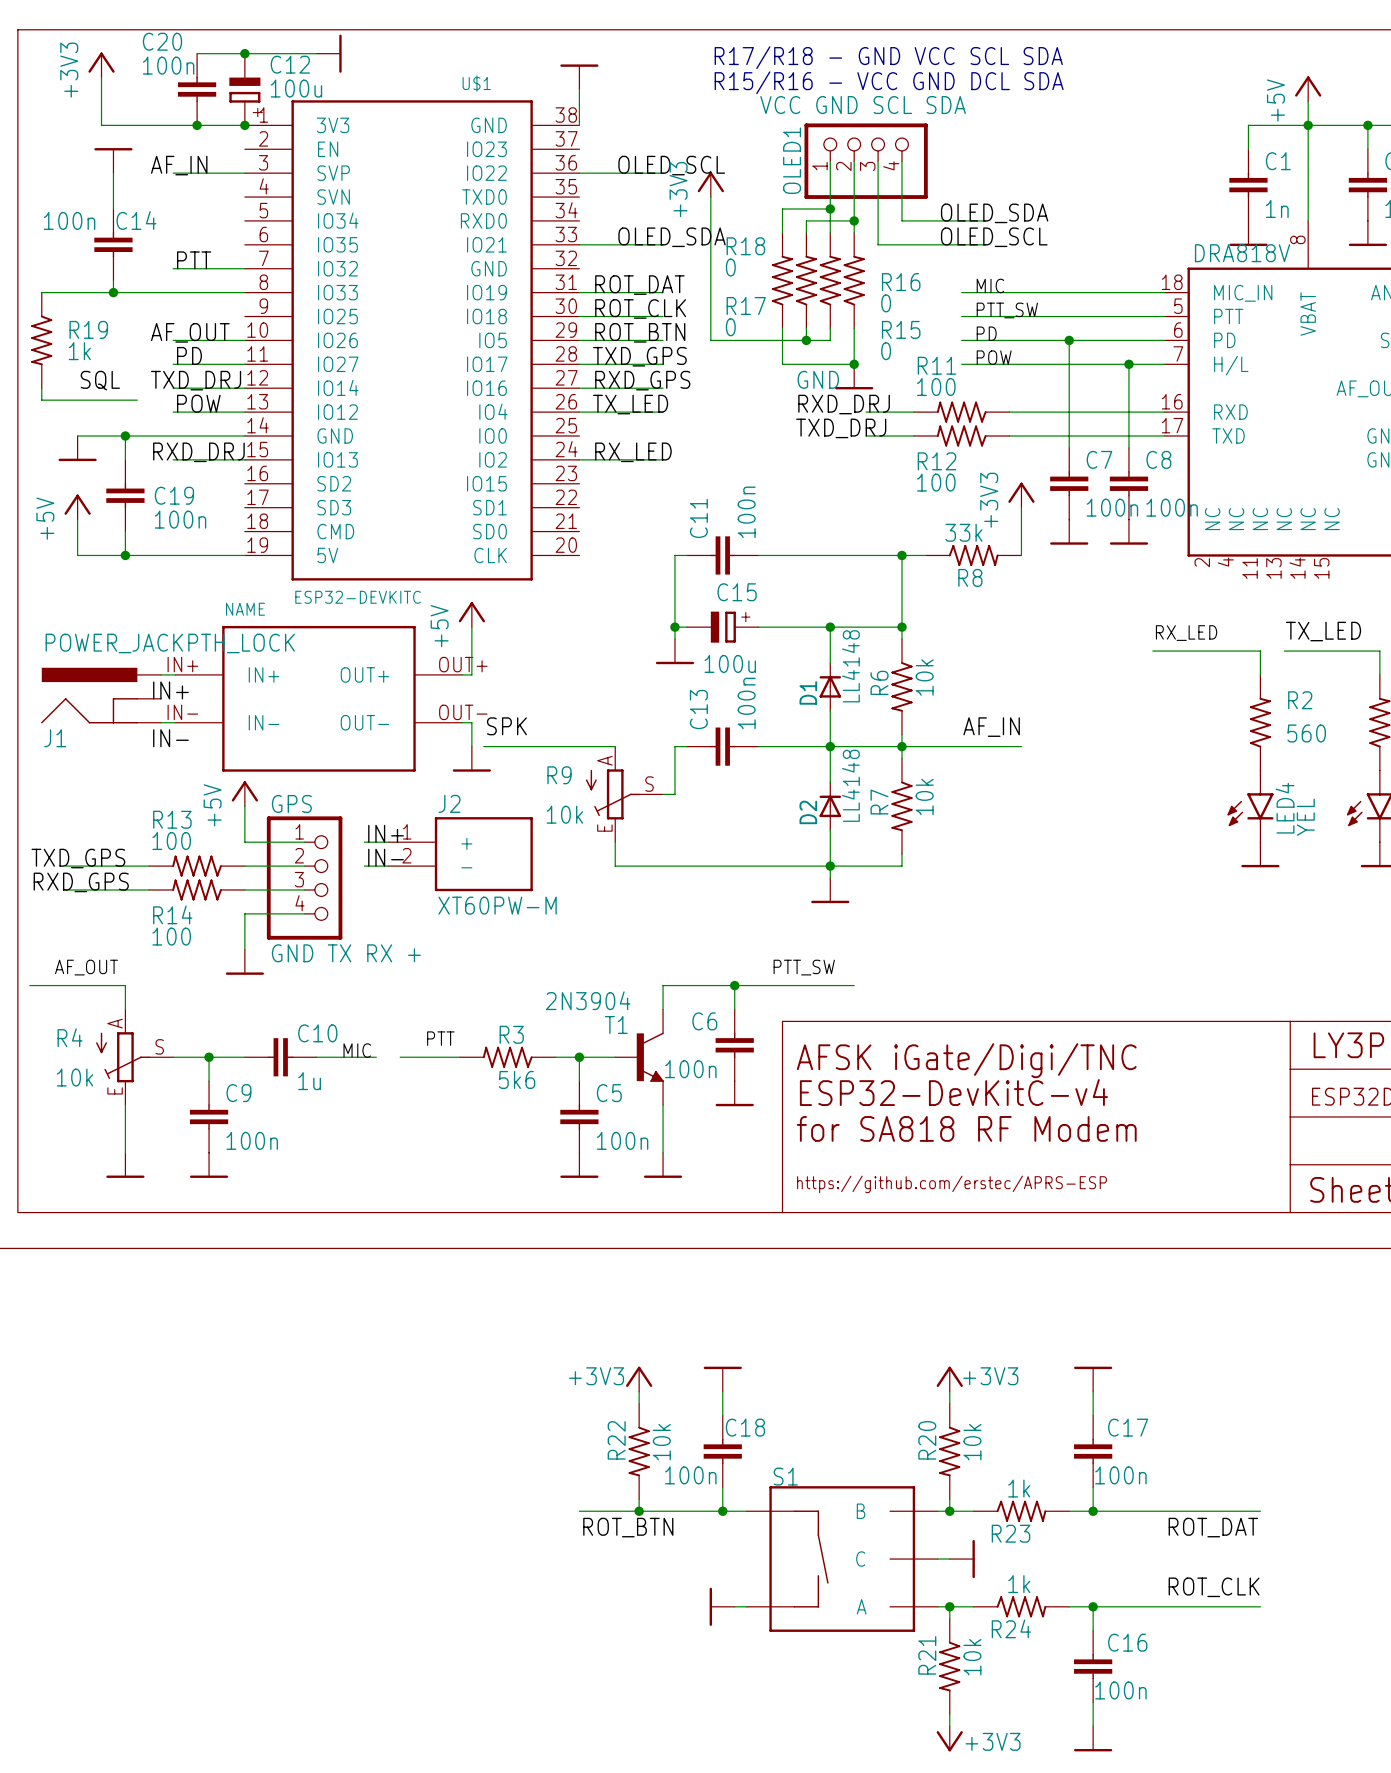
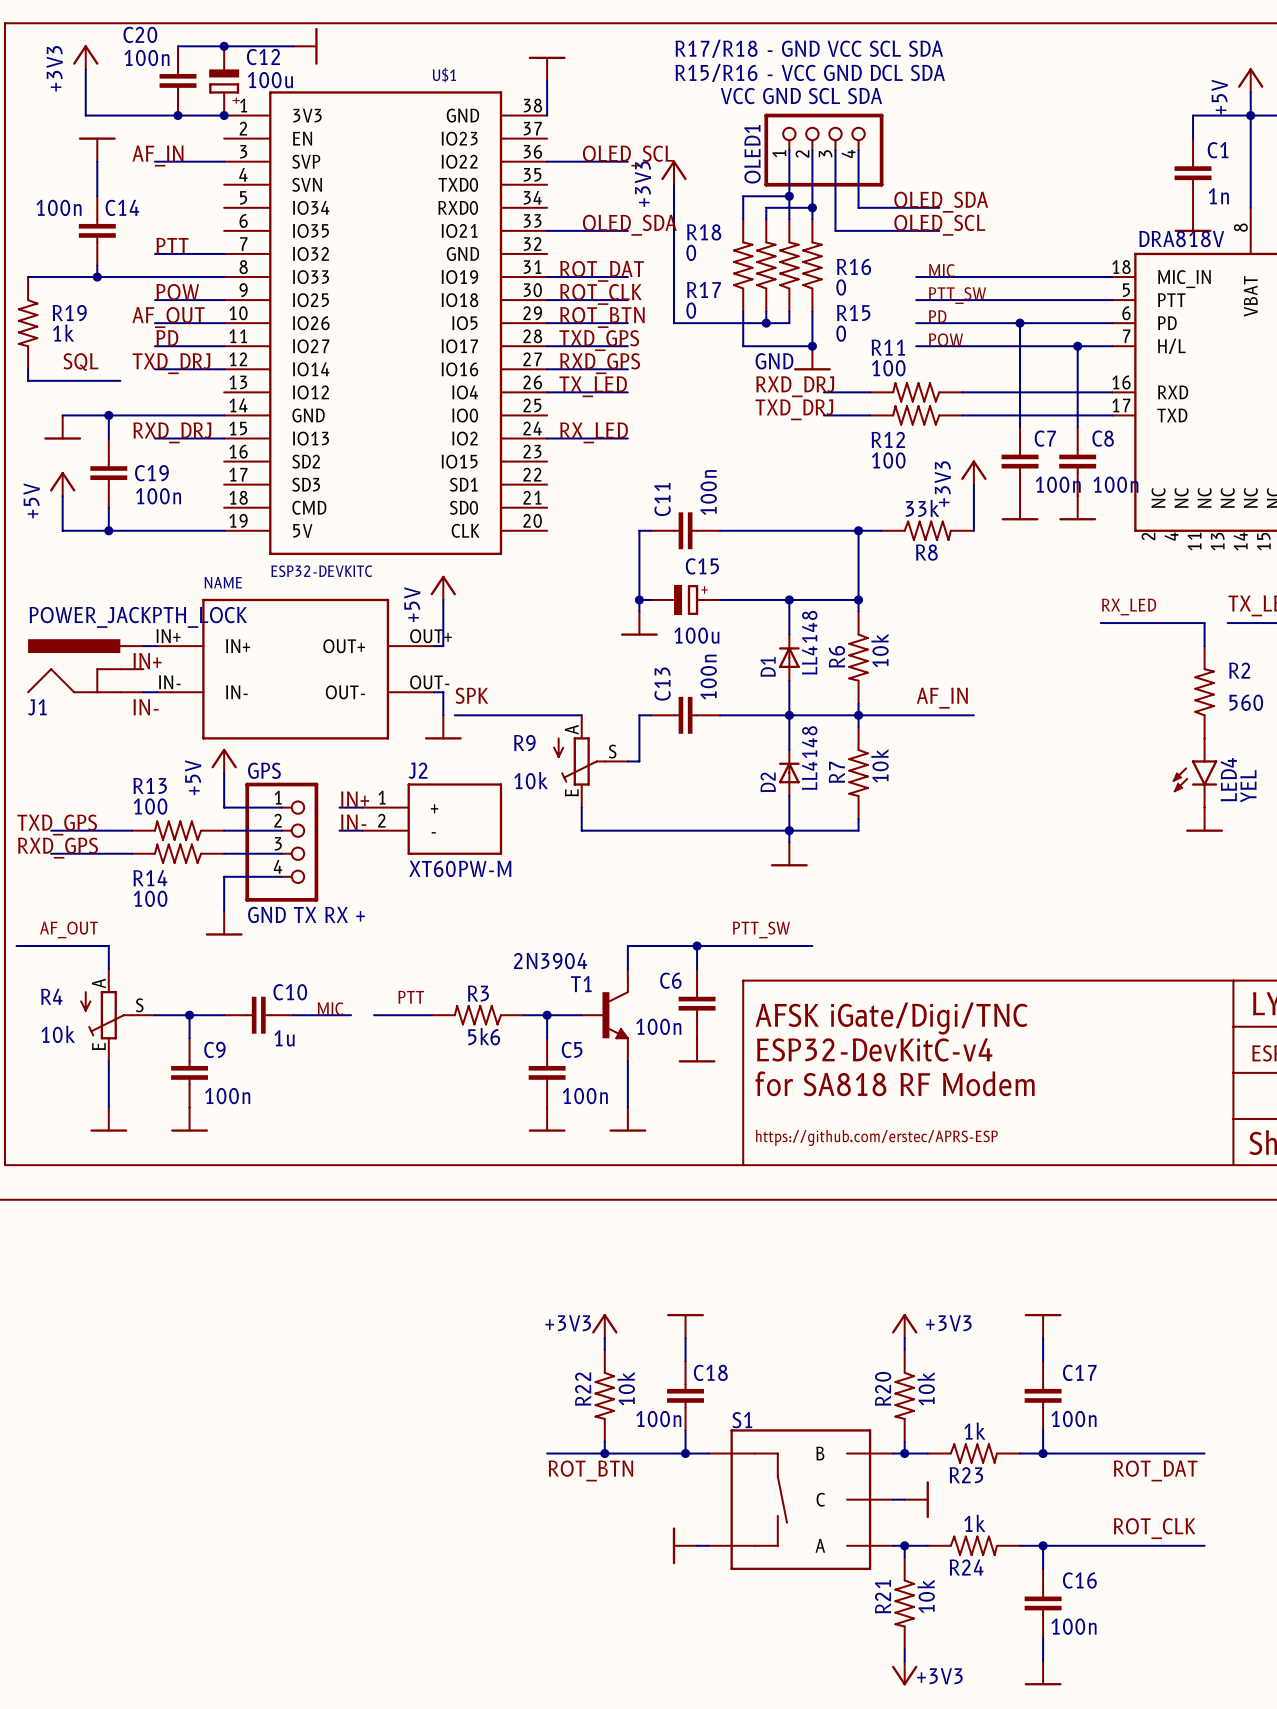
label position: POW (198, 403) -> POW (177, 292)
wire: (173, 412) (244, 412) -> (154, 300) (224, 300)

